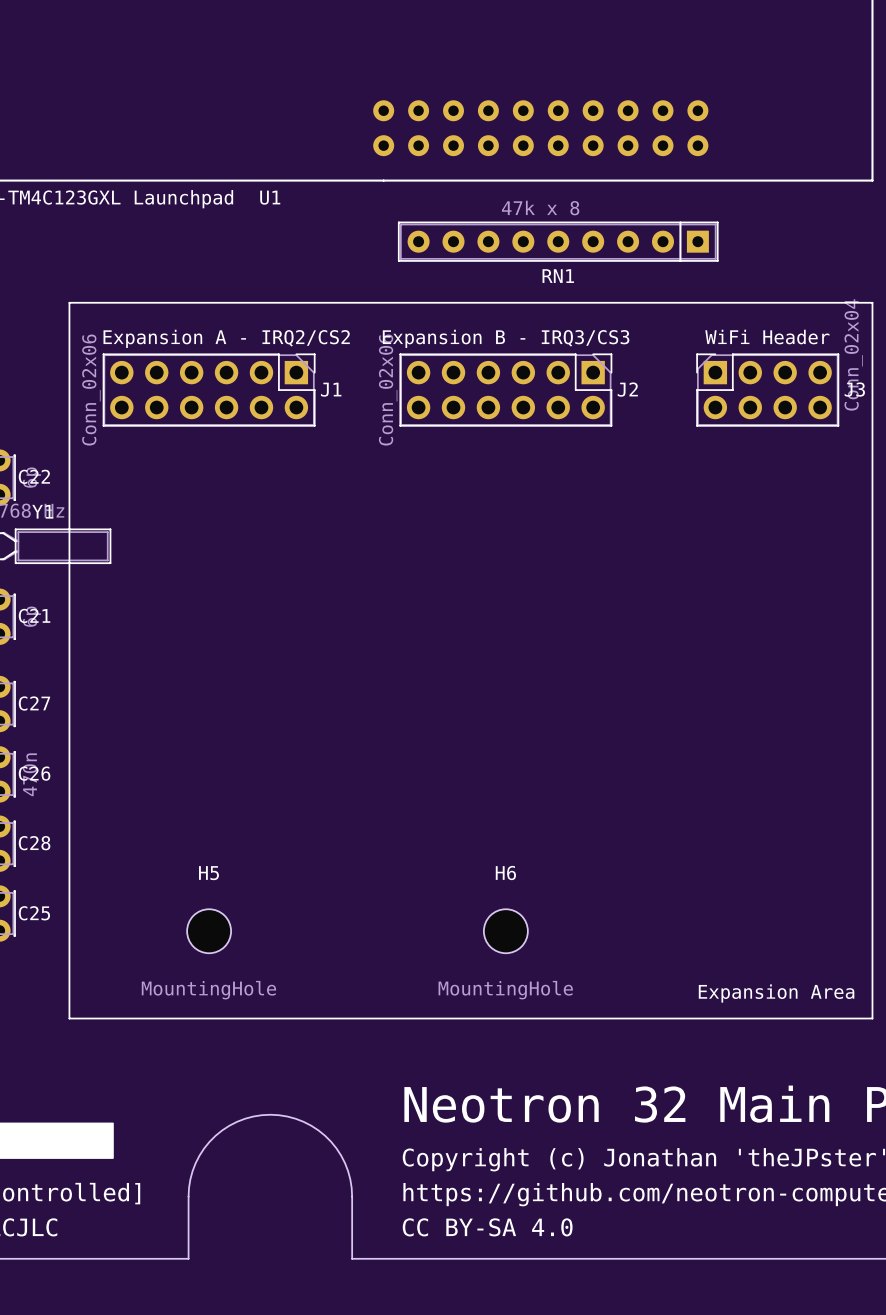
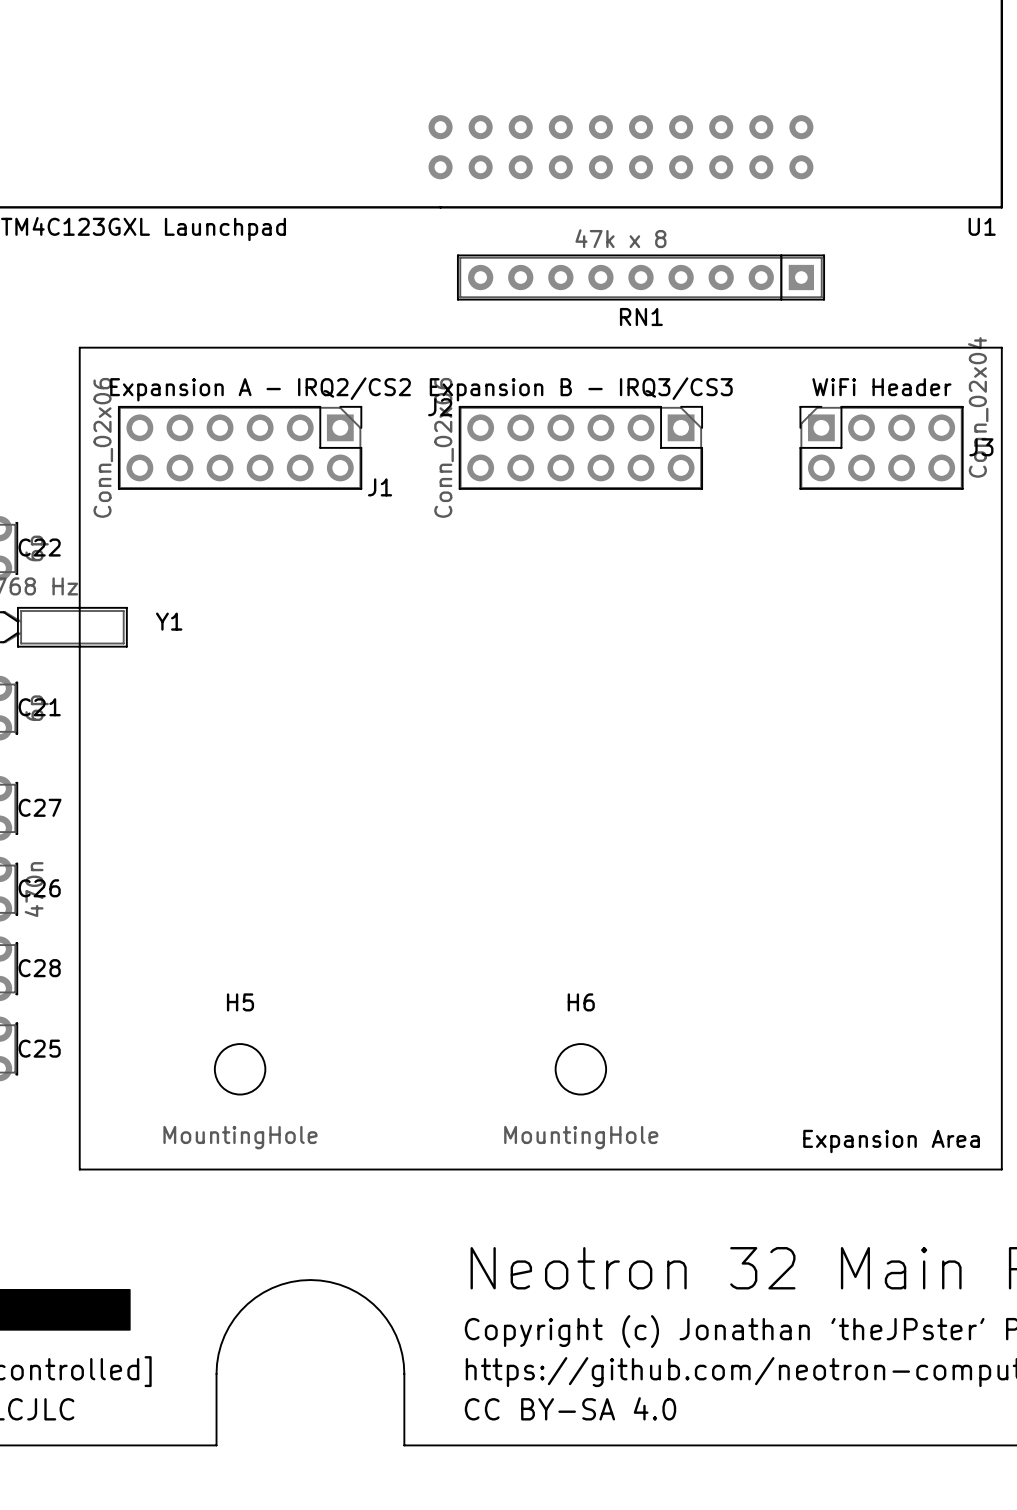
U1 name position: U1 (270, 197) -> U1 (982, 226)
J1 name position: J1 (331, 389) -> J1 (380, 487)
J2 name position: J2 (627, 389) -> J2 (440, 407)
Y1 name position: Y1 (42, 511) -> Y1 (169, 621)

